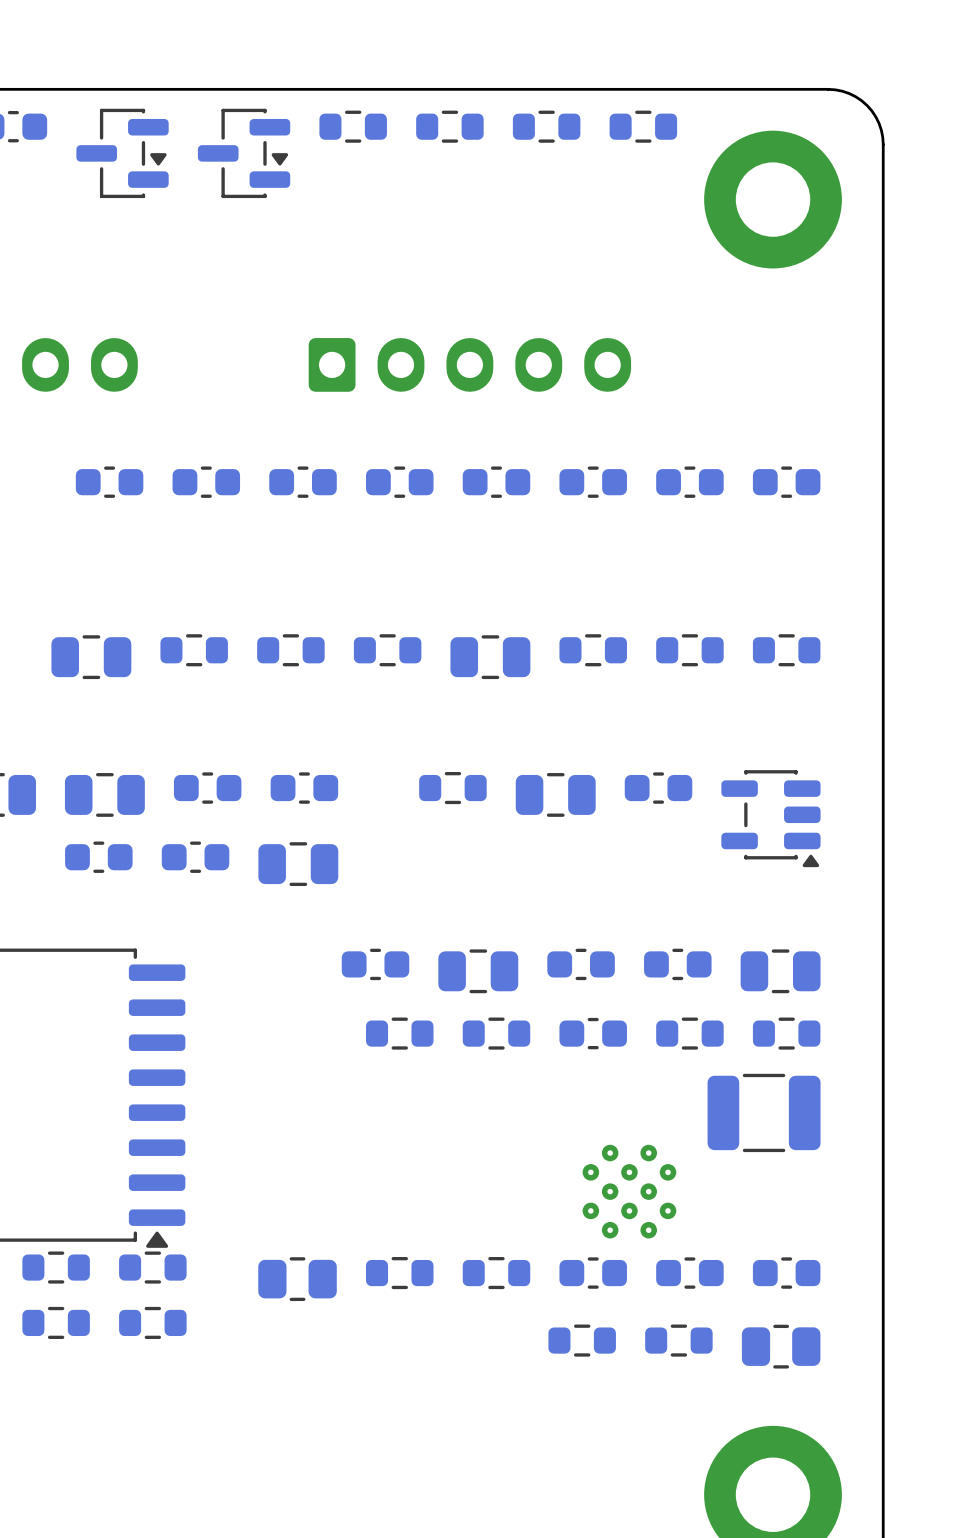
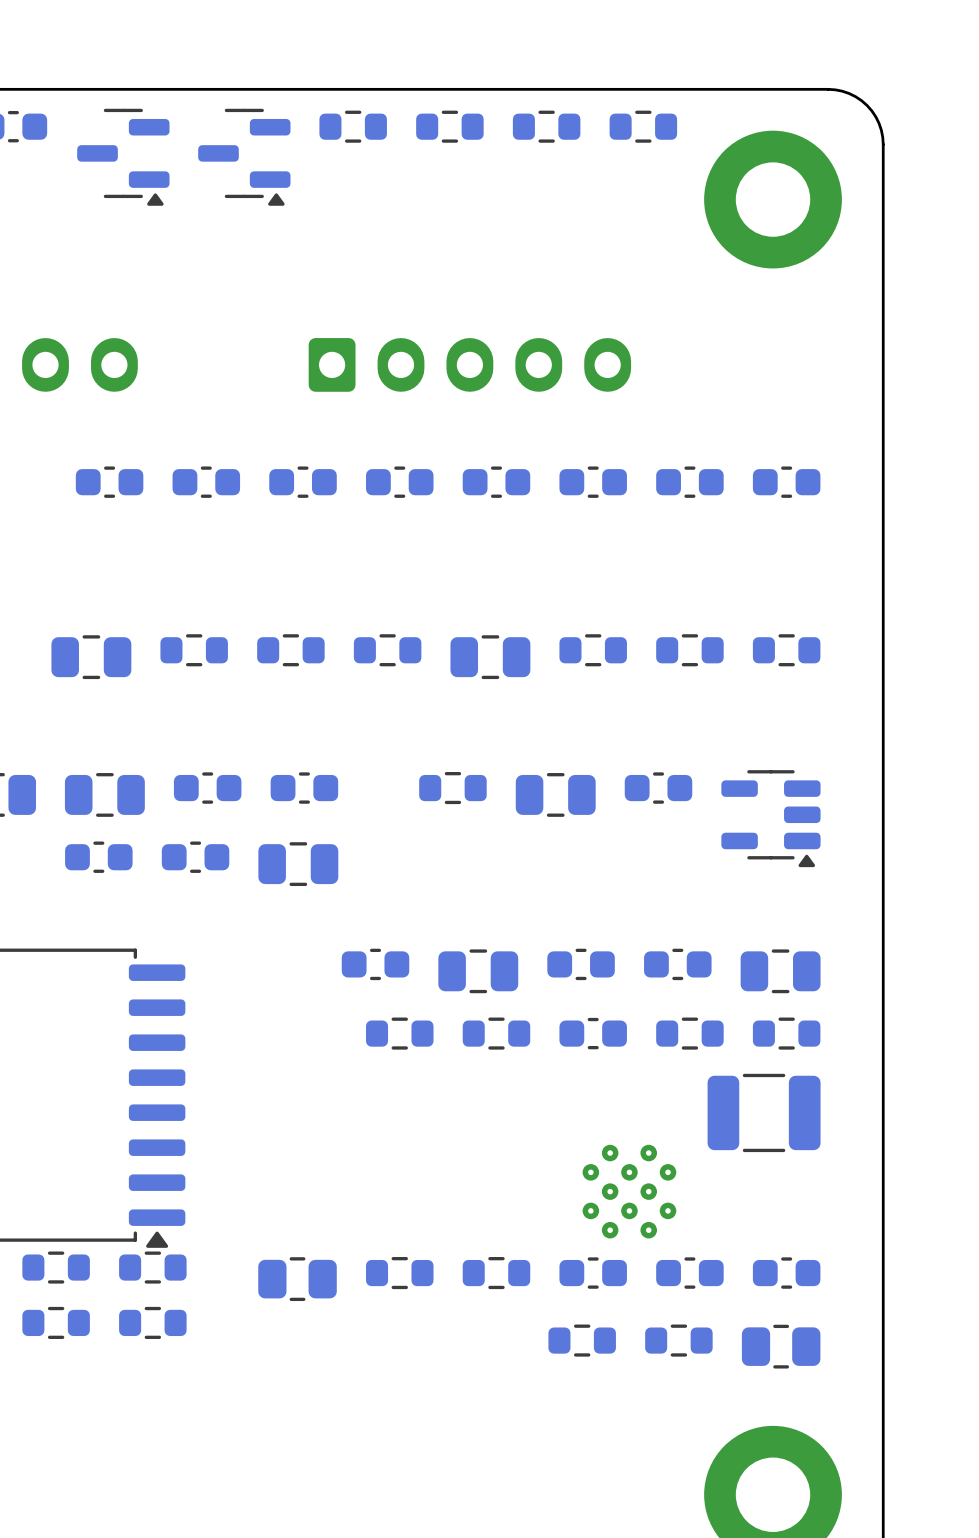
part footprint: [76, 108, 169, 199] -> [77, 108, 170, 206]
part footprint: [197, 108, 291, 199] -> [198, 108, 291, 206]
part footprint: [721, 770, 821, 868] -> [721, 770, 821, 868]

